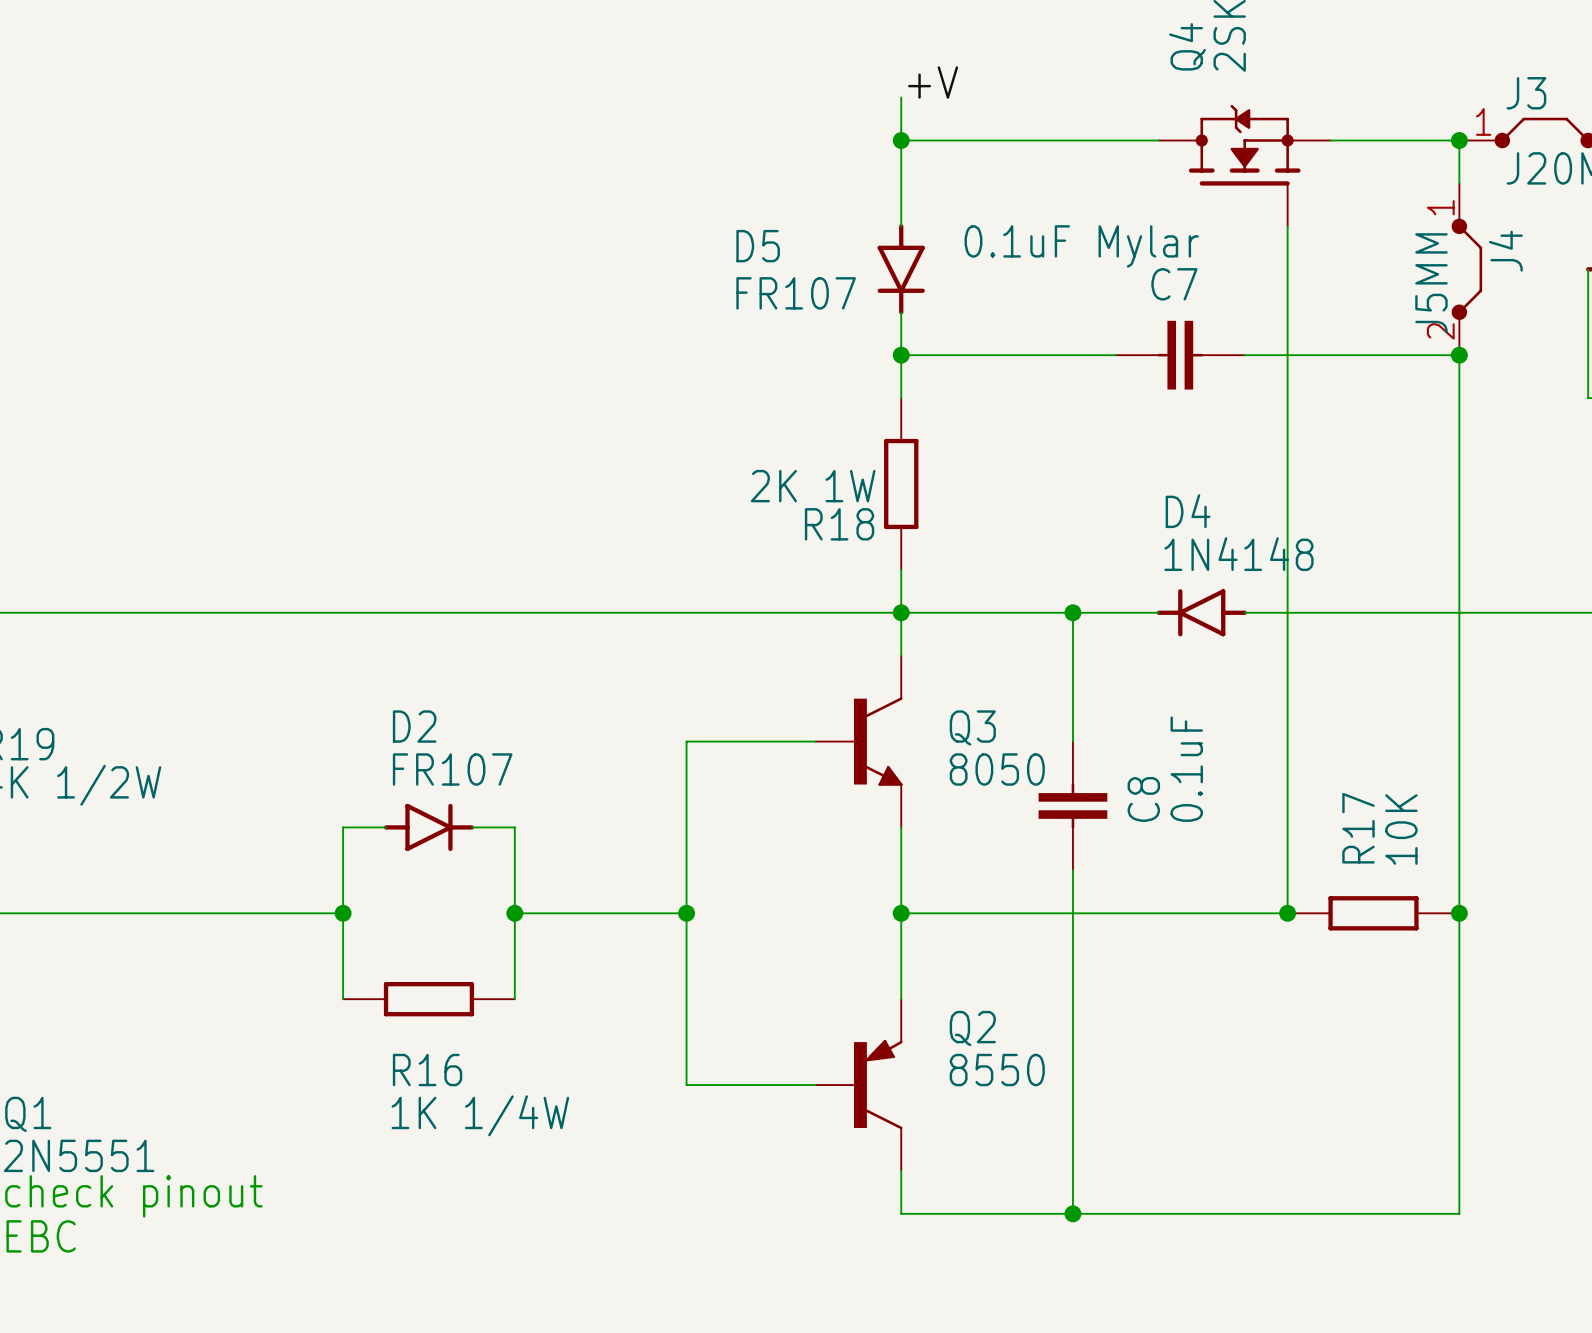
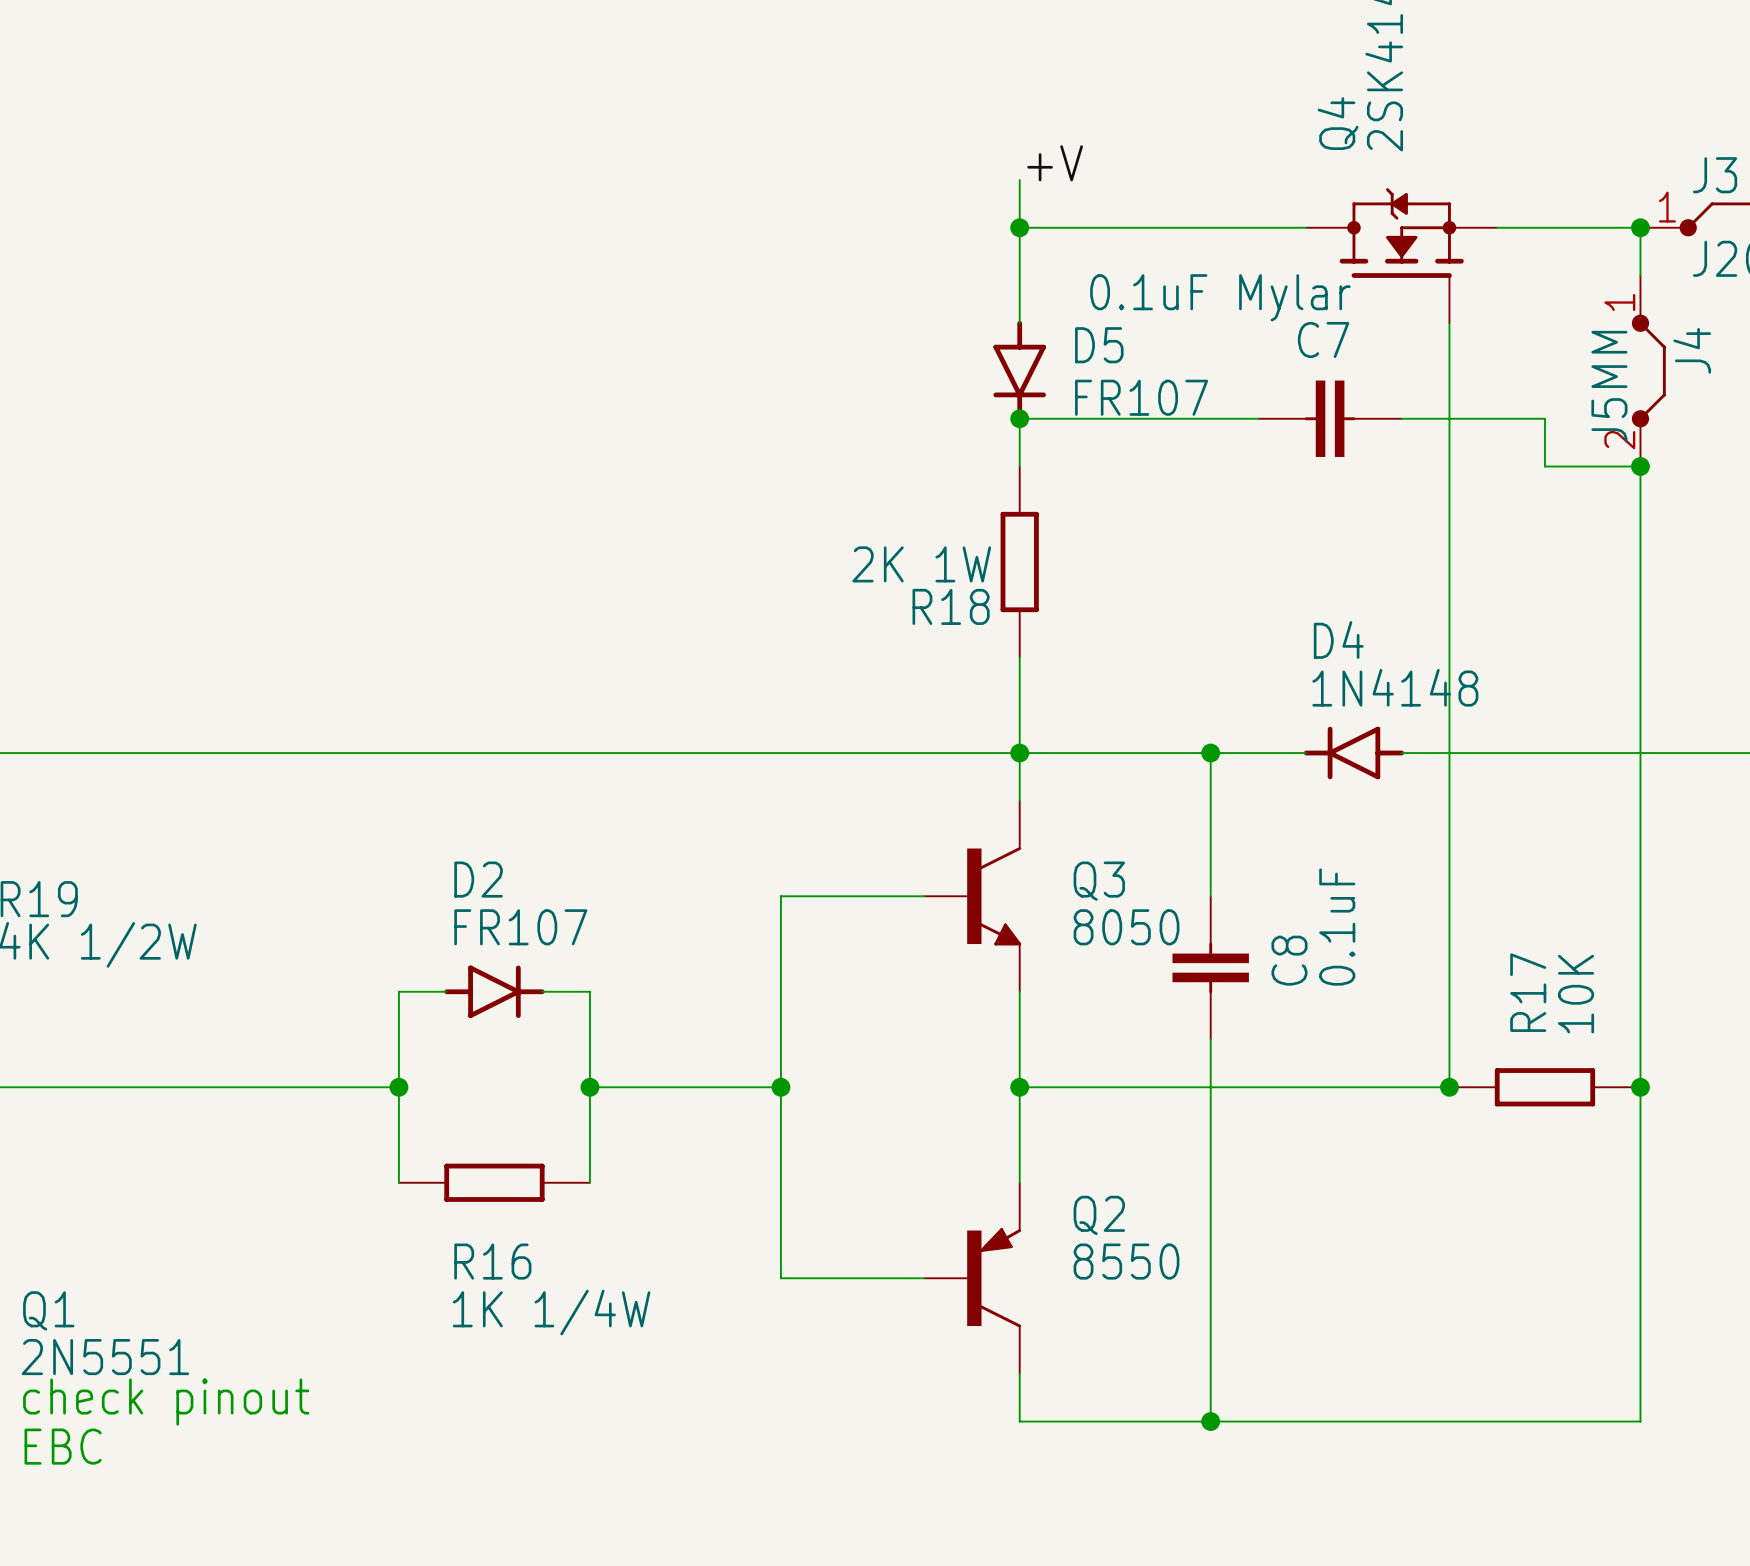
D5 name position: D5 (758, 246) -> D5 (1099, 345)
D5 value position: FR107 (796, 293) -> FR107 (1141, 397)
wire: none -> (1019, 418) (1258, 418)
junction position: (901, 355) -> (1019, 418)
wire: (1115, 355) (901, 355) (901, 398) -> none
C7 position: (1180, 355) -> (1330, 418)
wire: (1244, 355) (1373, 355) -> (1401, 418) (1544, 418) (1544, 466)
R18 position: (901, 483) -> (1019, 562)

